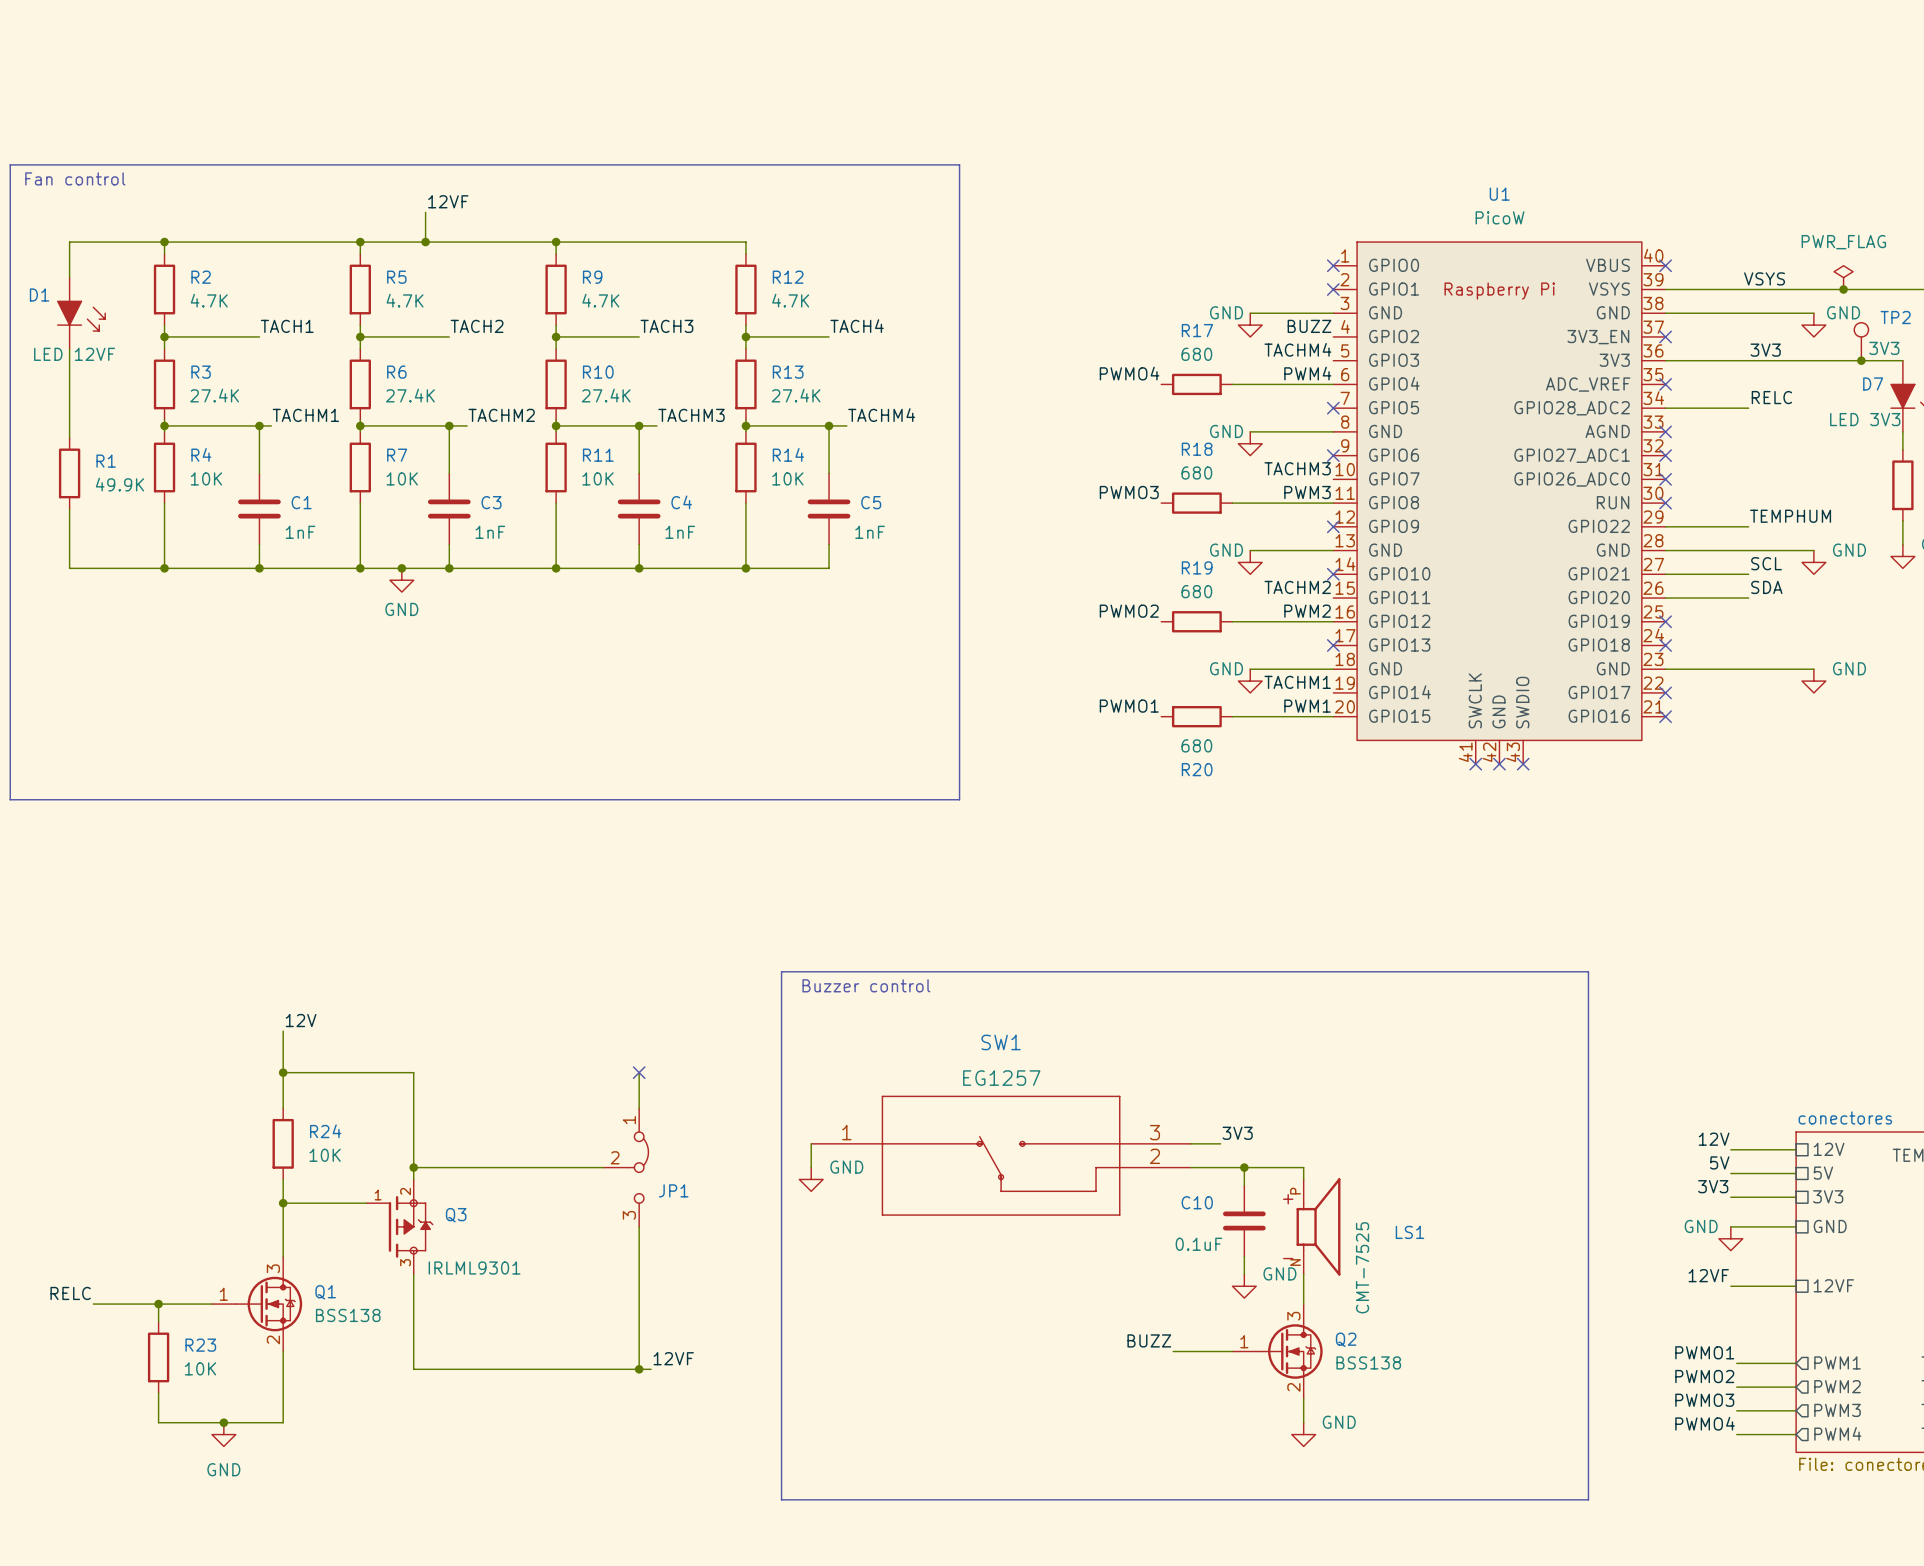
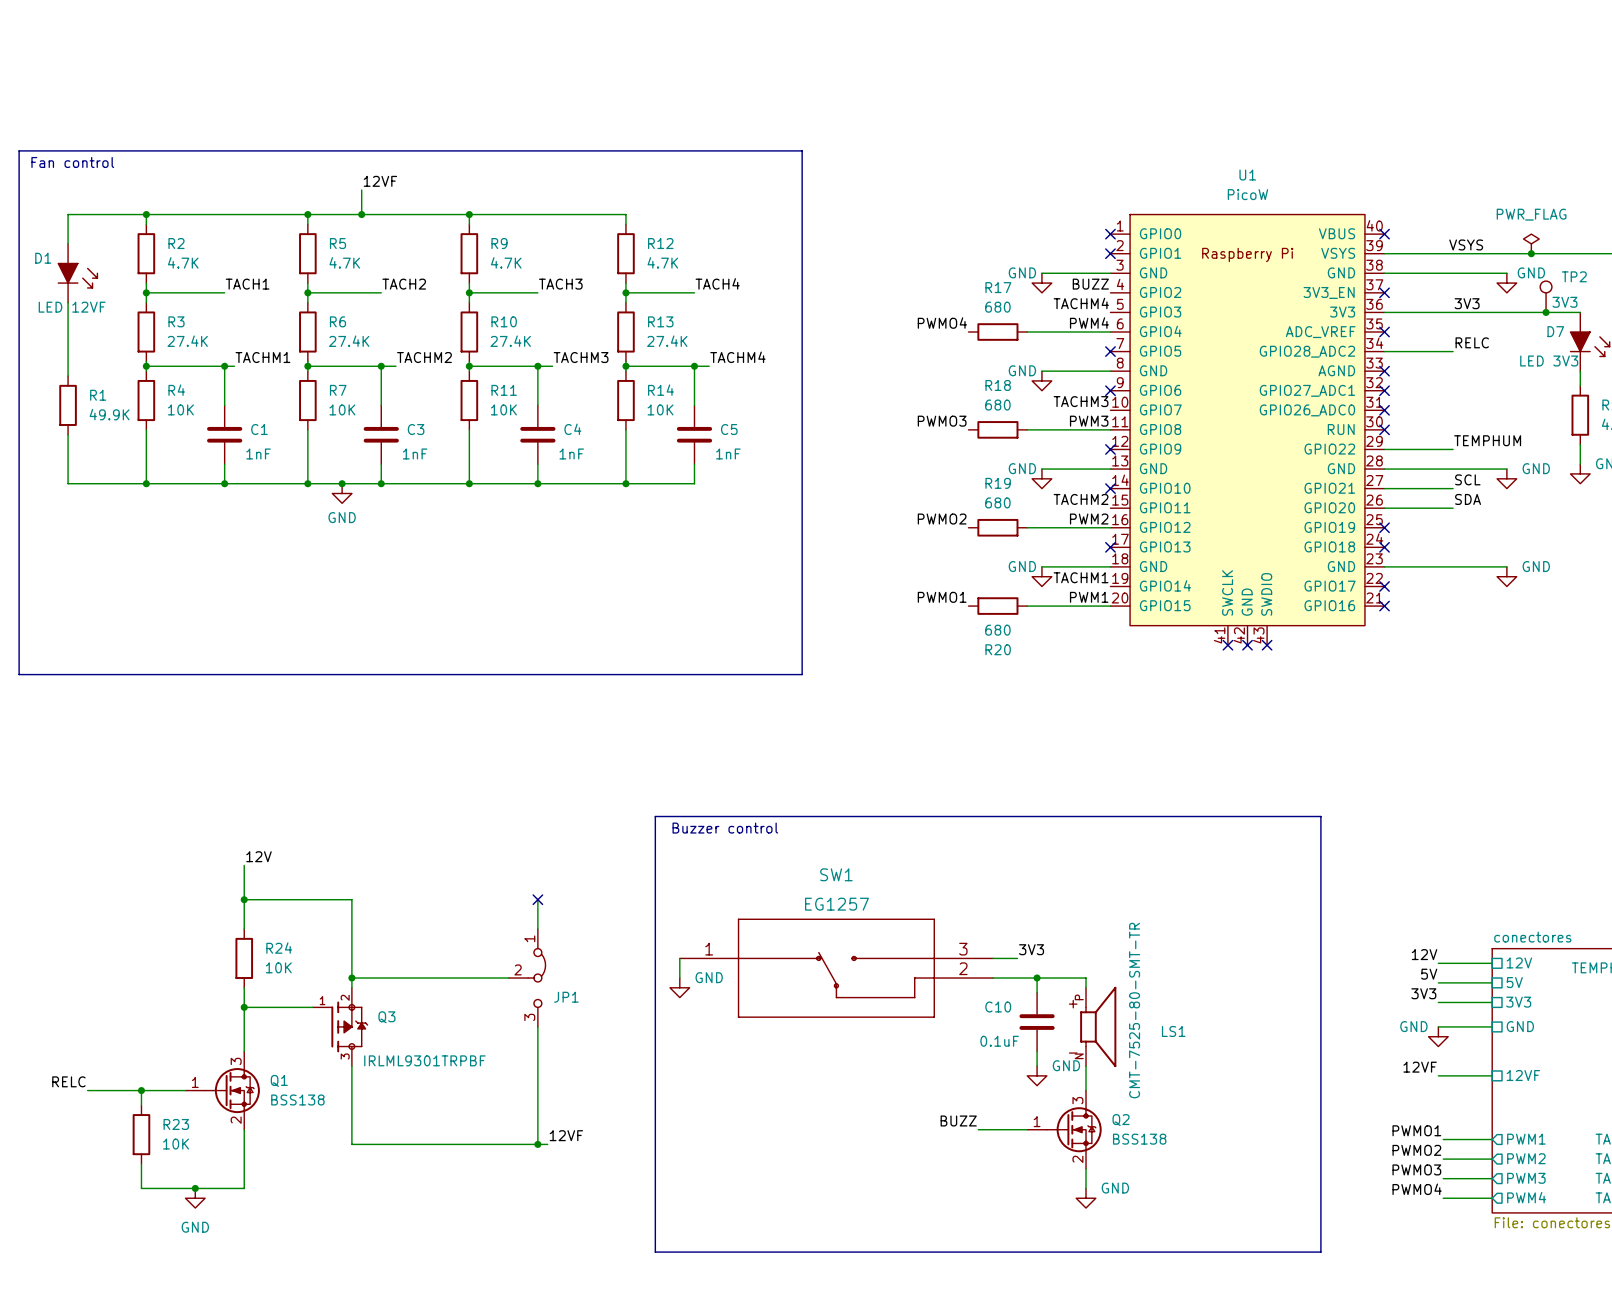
LS1 value: CMT-7525 (1362, 1267) -> CMT-7525-80-SMT-TR (1134, 1010)
Q3 value: IRLML9301 (474, 1268) -> IRLML9301TRPBF (424, 1060)

